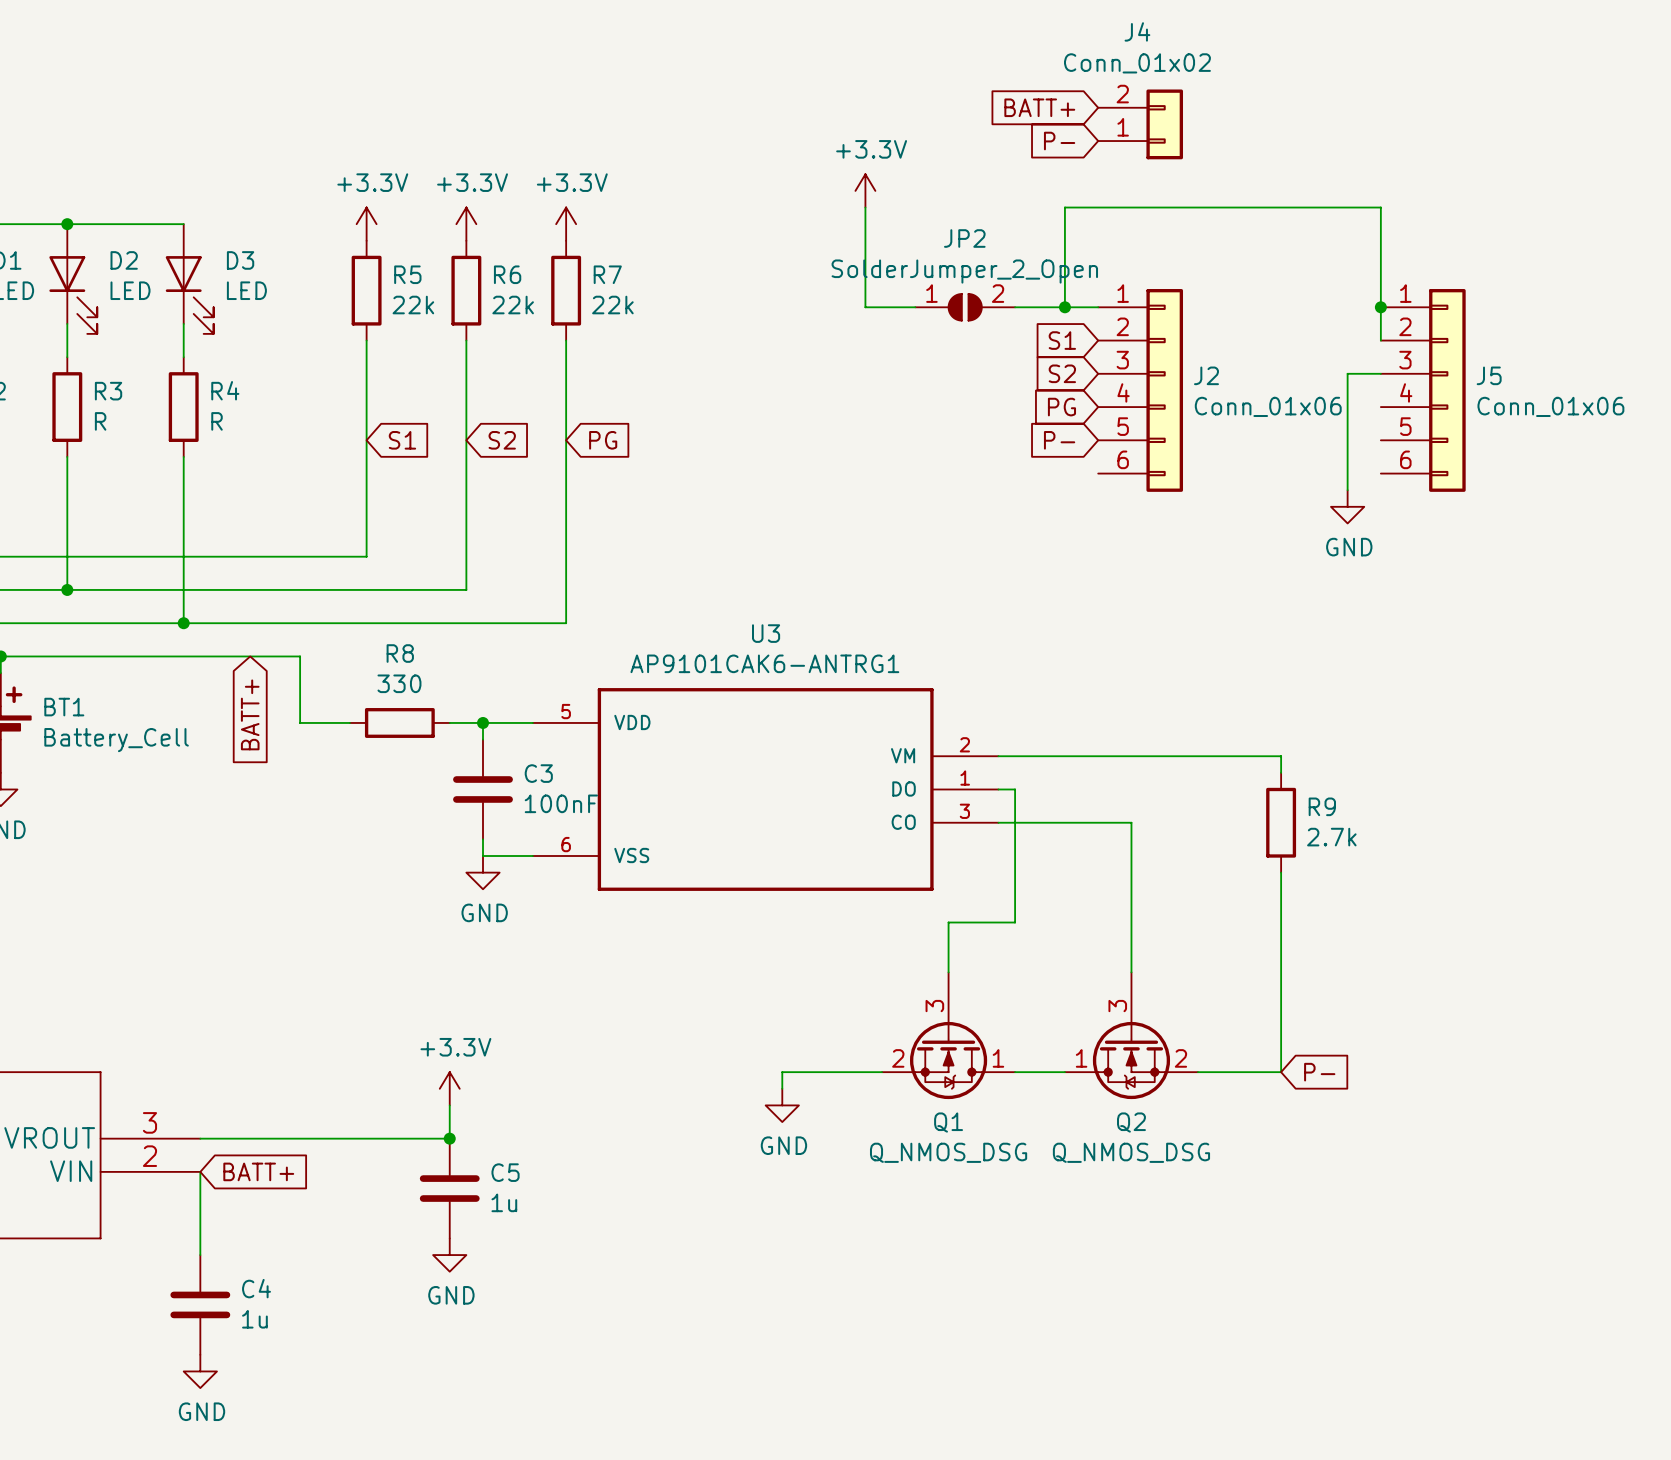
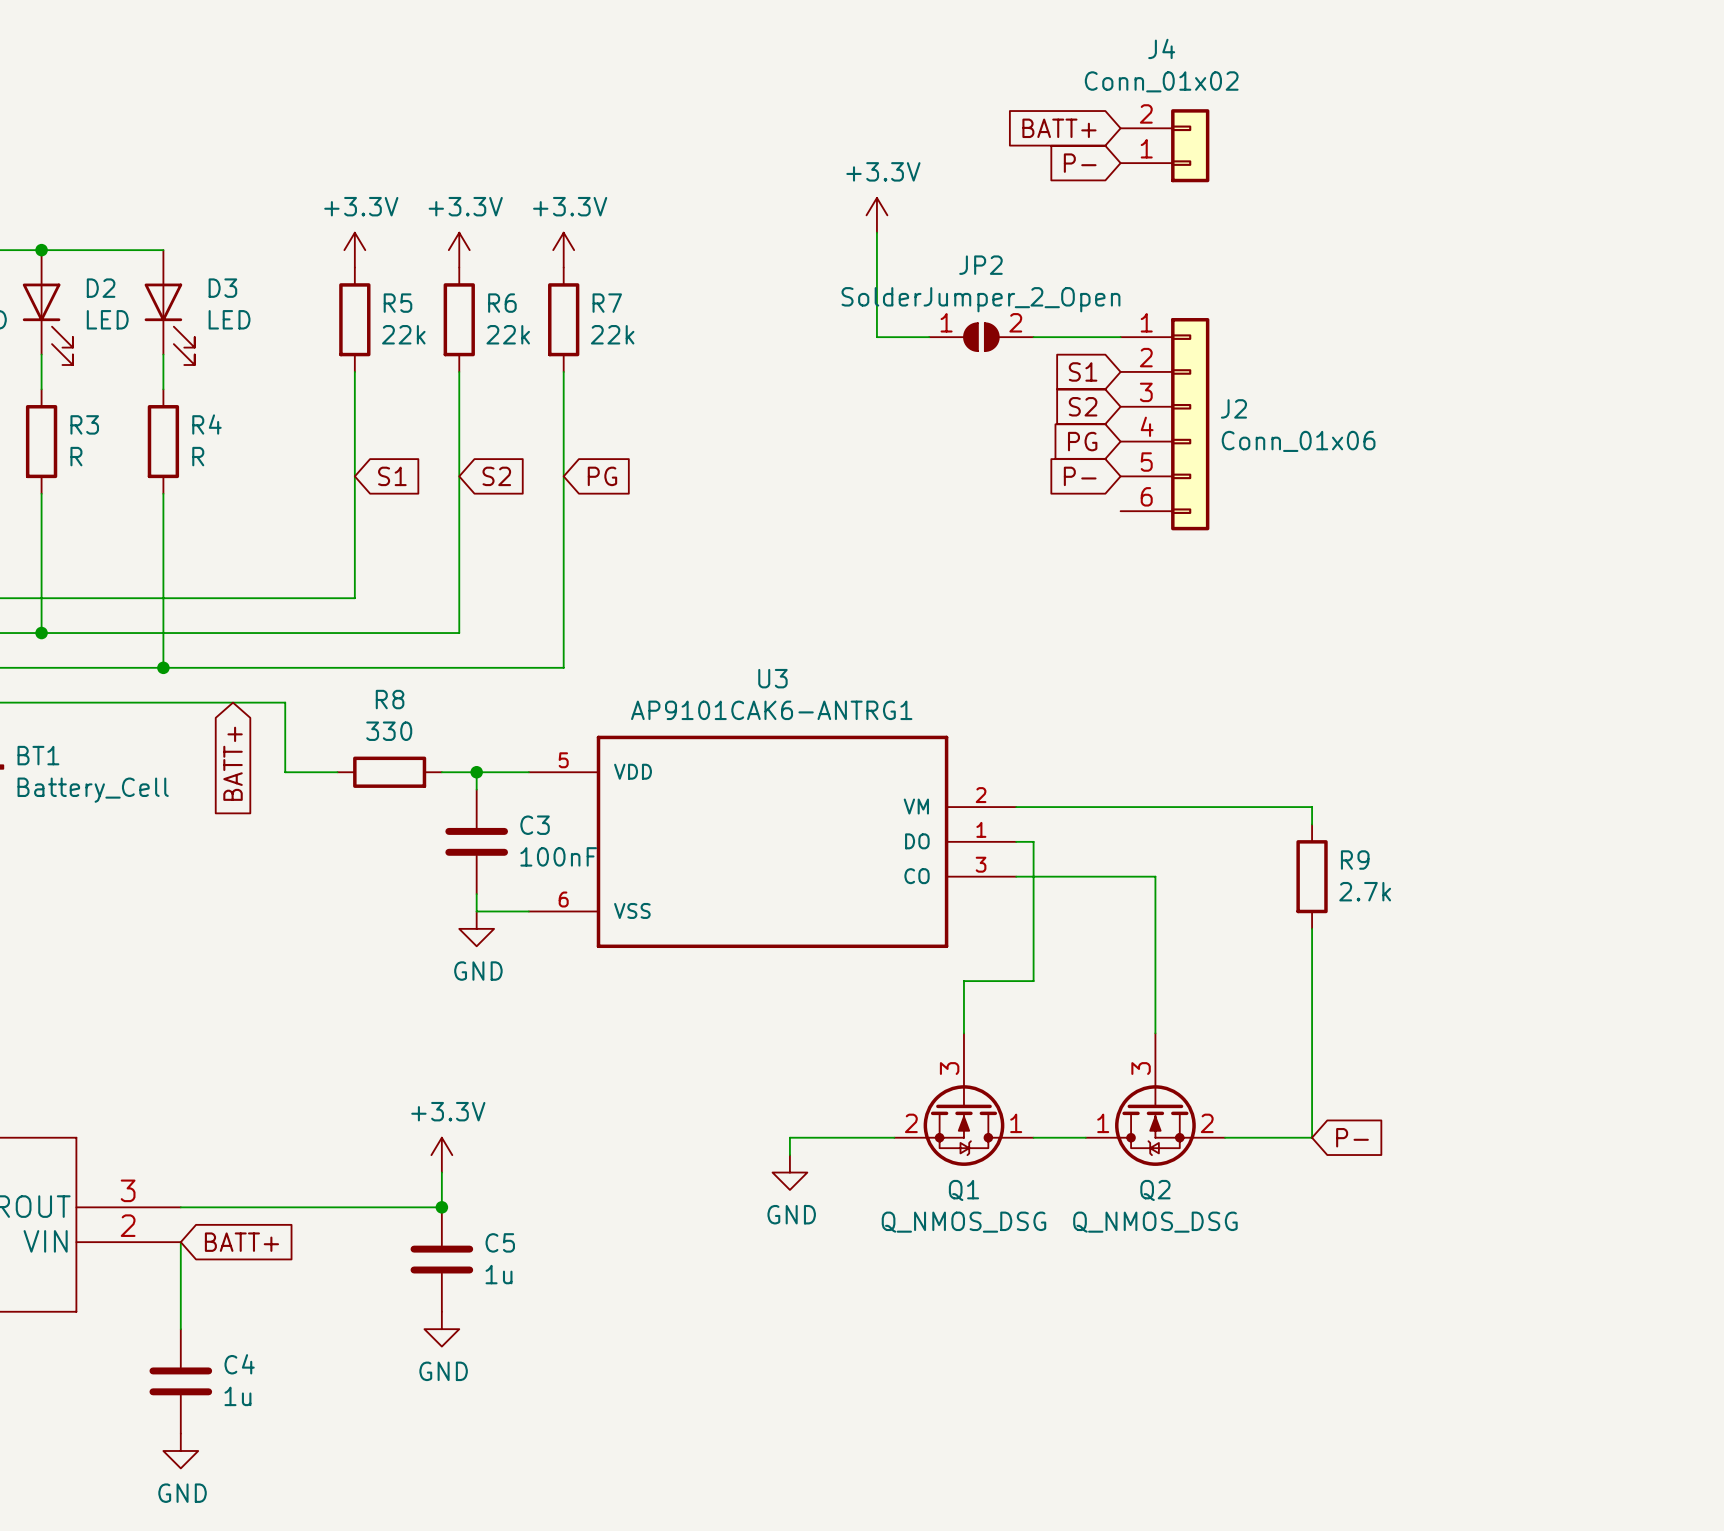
wire: (1064, 307) (1064, 207) (1380, 207) (1380, 340) -> none
junction: (1064, 307) -> none
junction: (1380, 307) -> none
wire: (1380, 373) (1347, 373) (1347, 490) -> none
J5: Conn_01x06 (1423, 390) -> none
power symbol: GND (1347, 506) -> none

